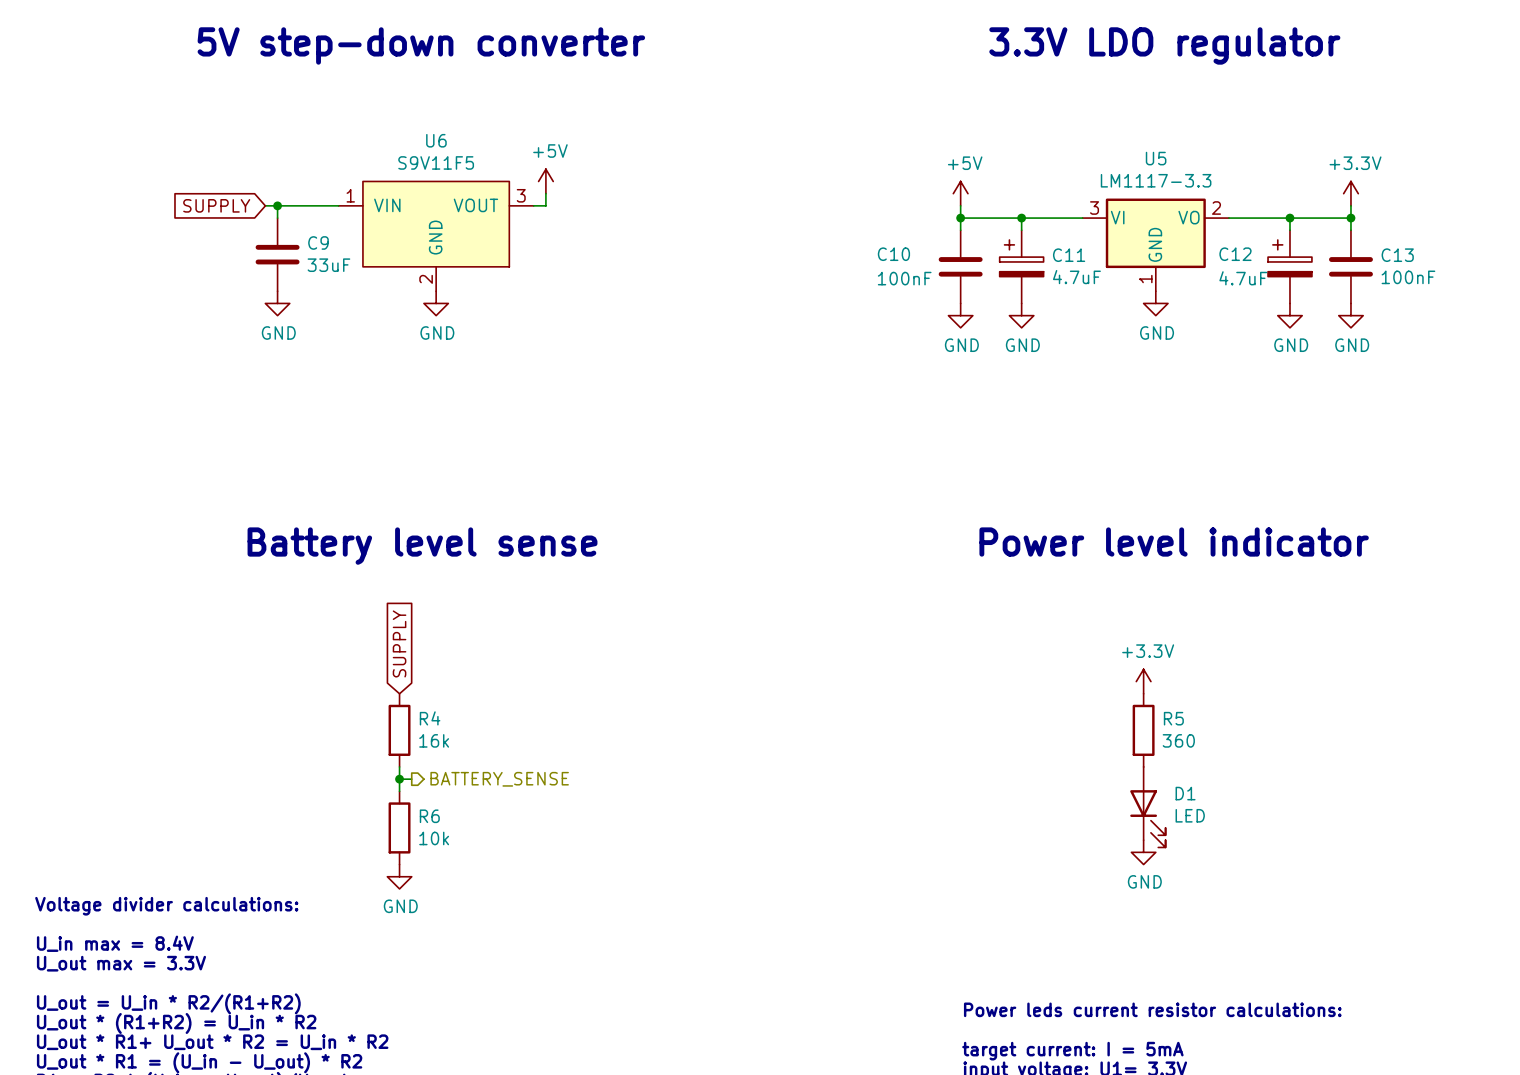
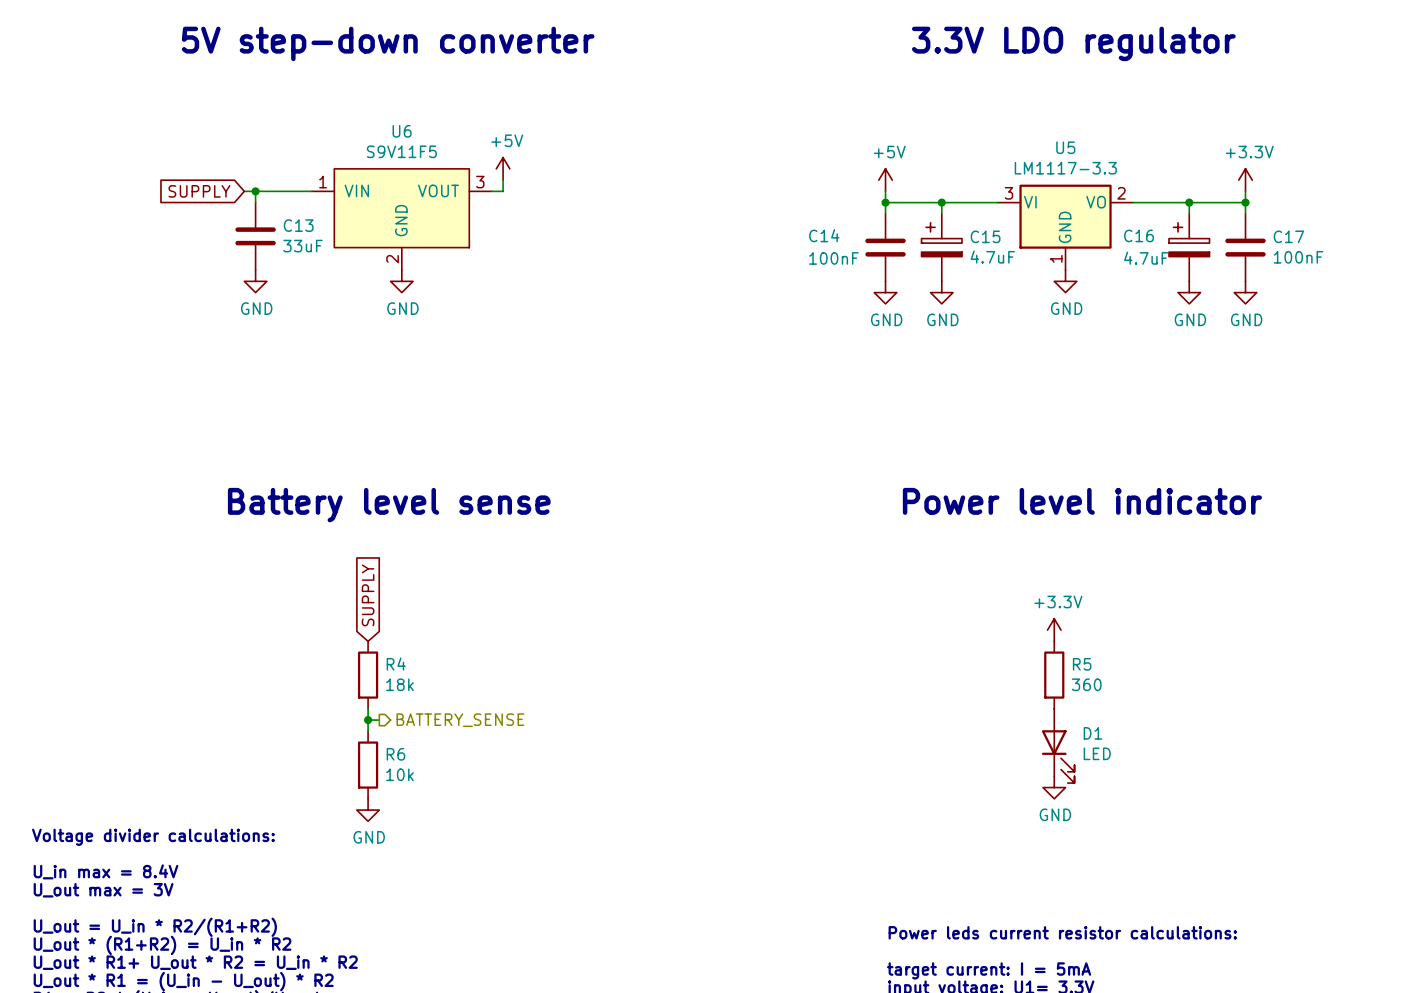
C9 name: C9 (318, 242) -> C13 (298, 225)
C10 name: C10 (893, 254) -> C14 (824, 235)
C12 name: C12 (1235, 254) -> C16 (1138, 235)
C11 name: C11 (1069, 255) -> C15 (985, 236)
C13 name: C13 (1397, 255) -> C17 (1288, 236)
R4 value: 16k (434, 740) -> 18k (399, 684)
text: U_out max = 3.3V (121, 963) -> U_out max = 3V (103, 890)

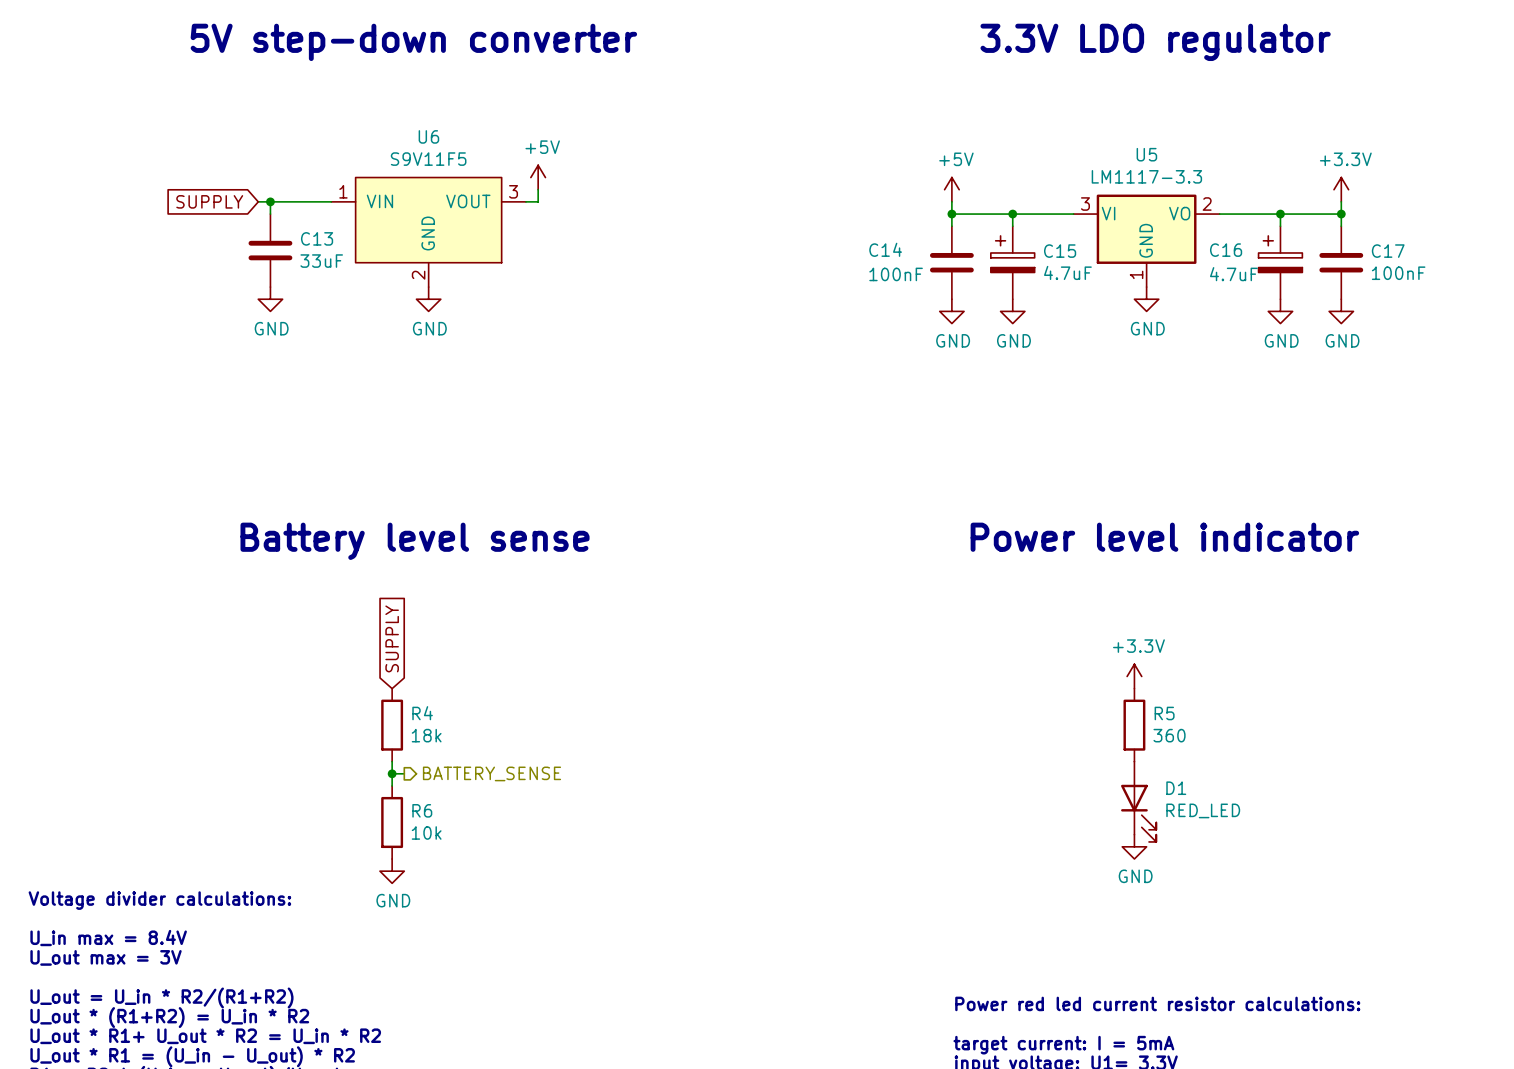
D1 value: LED (1097, 753) -> RED_LED (1203, 810)
text: Power leds current resistor calculations: (1062, 932) -> Power red led current resistor calculations: (1157, 1003)

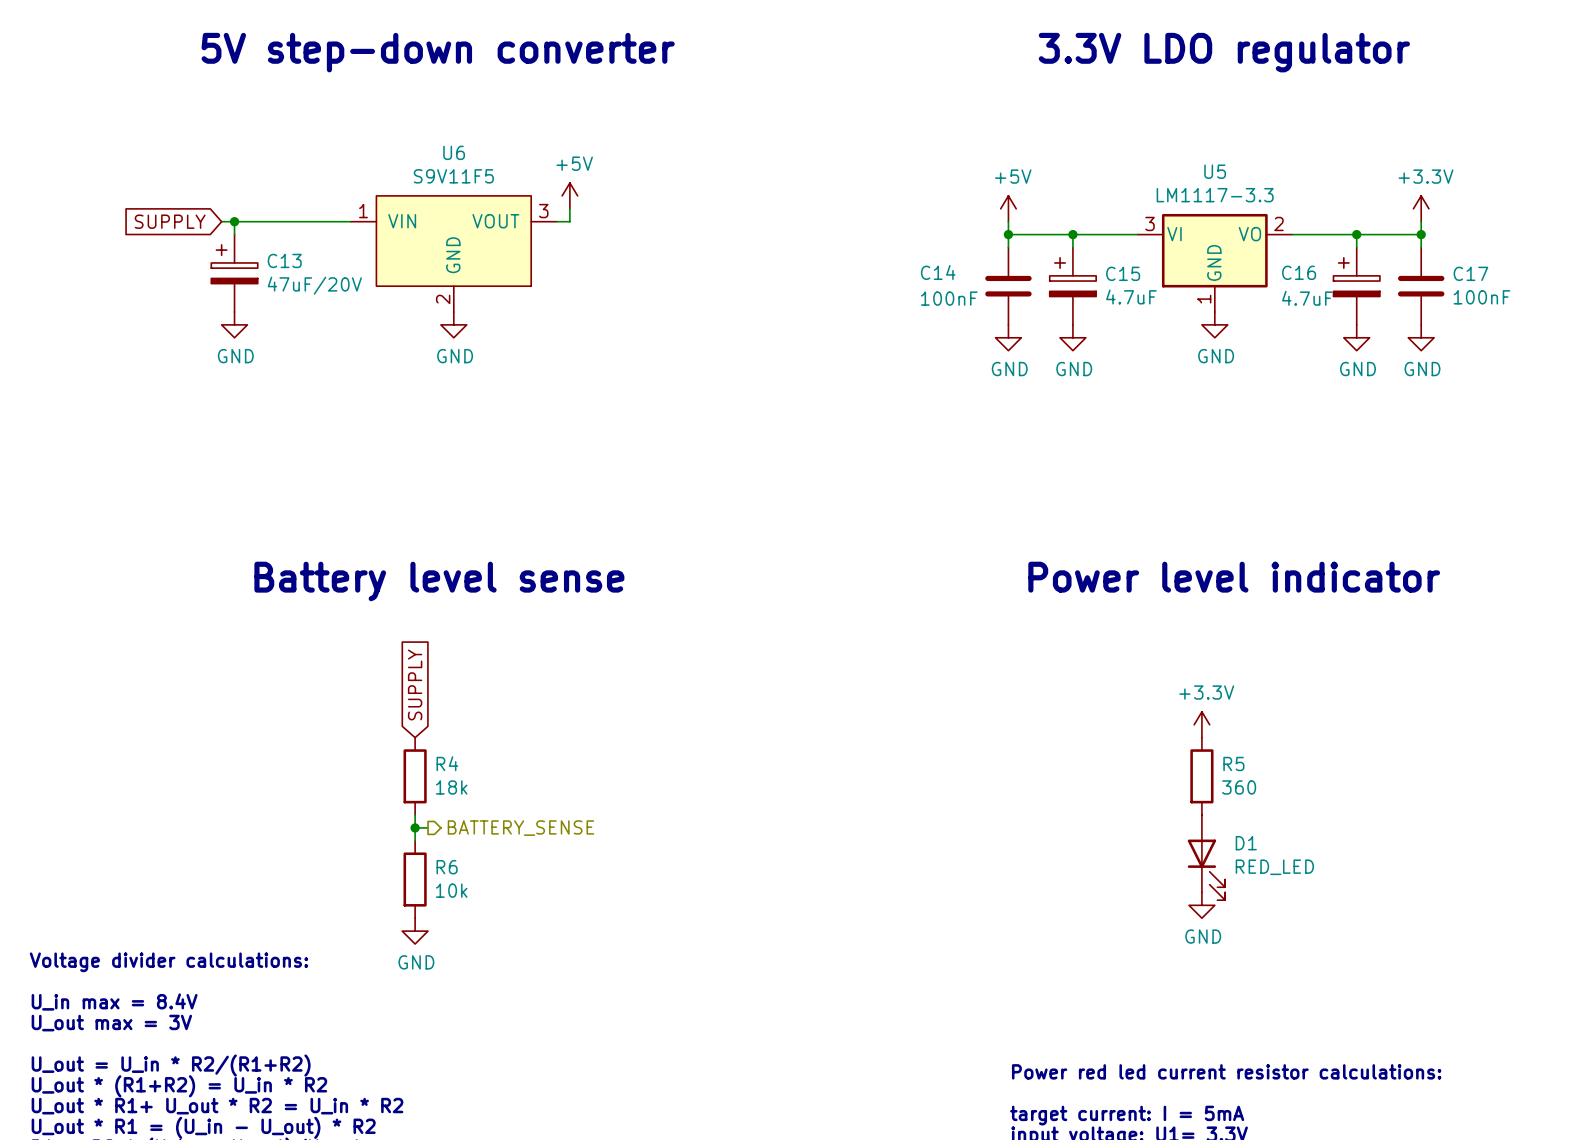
wire: none -> (221, 221) (273, 221)
global label position: SUPPLY (209, 201) -> SUPPLY (170, 221)
wire: (270, 201) (270, 214) -> (234, 221) (234, 234)
junction position: (270, 201) -> (234, 221)
C13 symbol: [248, 214, 293, 288] -> [211, 234, 258, 312]
C13 value: 33uF (321, 261) -> 47uF/20V (314, 285)
power symbol position: GND (270, 299) -> GND (234, 324)

